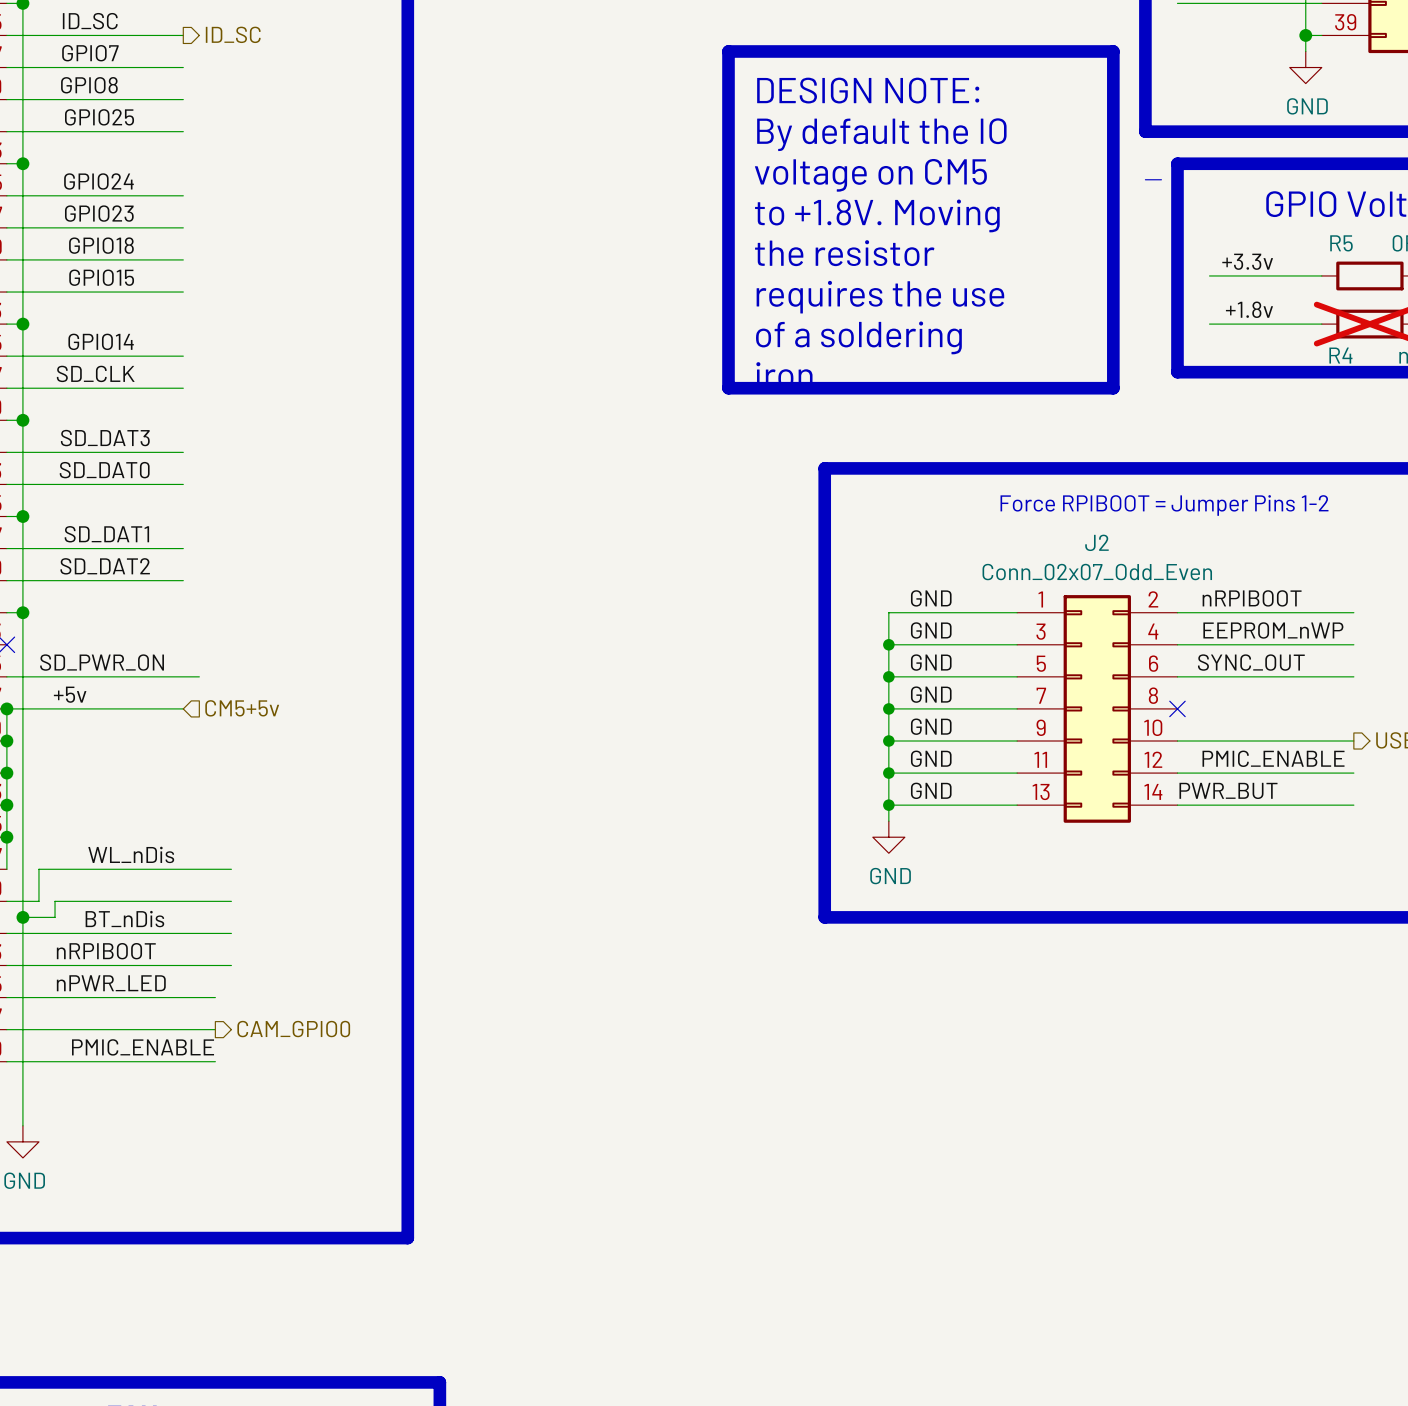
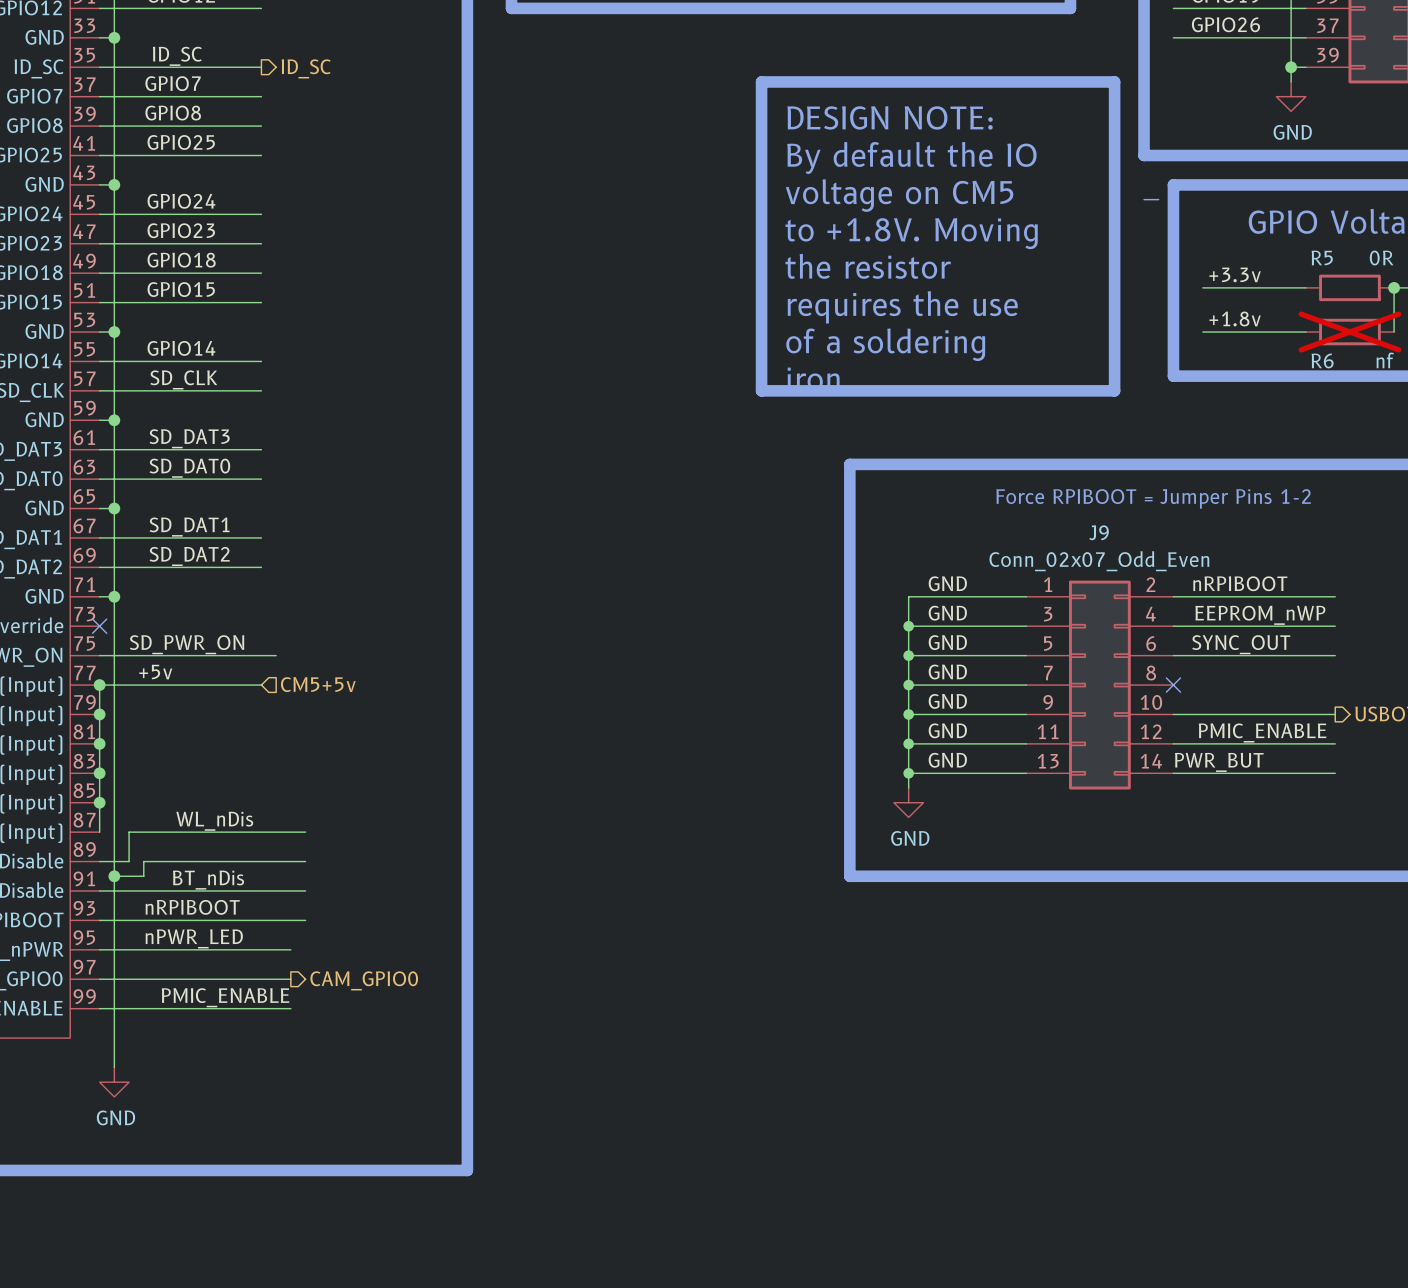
R4 name: R4 (1340, 355) -> R6 (1322, 360)
J2 name: J2 (1096, 542) -> J9 (1099, 532)

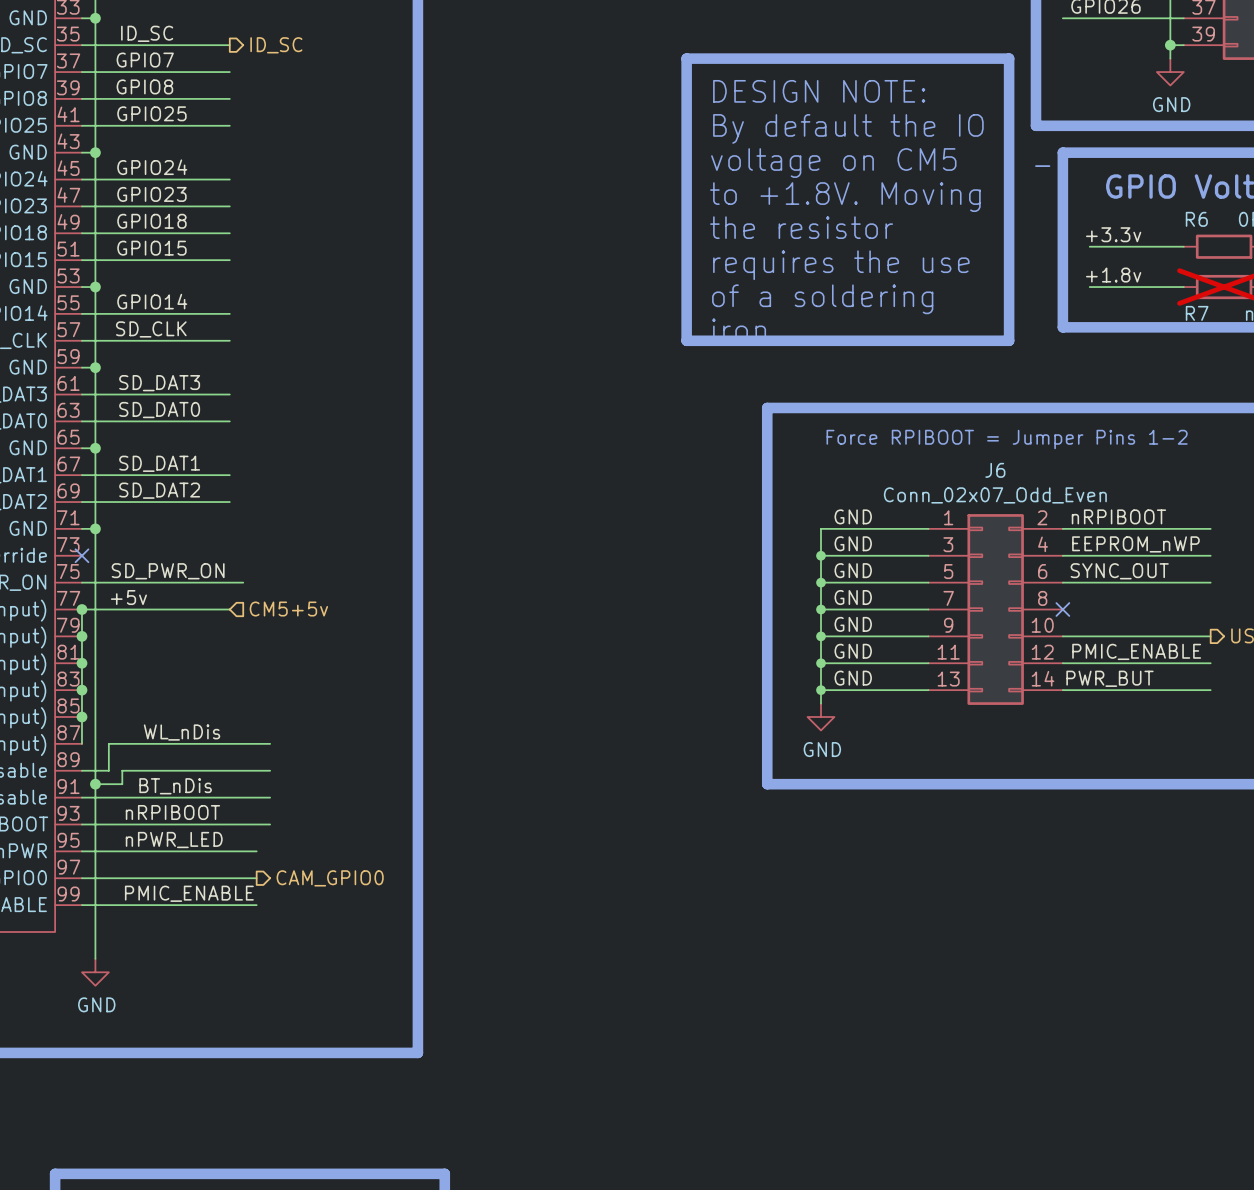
R5 name: R5 (1322, 257) -> R6 (1196, 219)
R6 name: R6 (1322, 360) -> R7 (1197, 313)
J9 name: J9 (1099, 532) -> J6 (995, 470)

